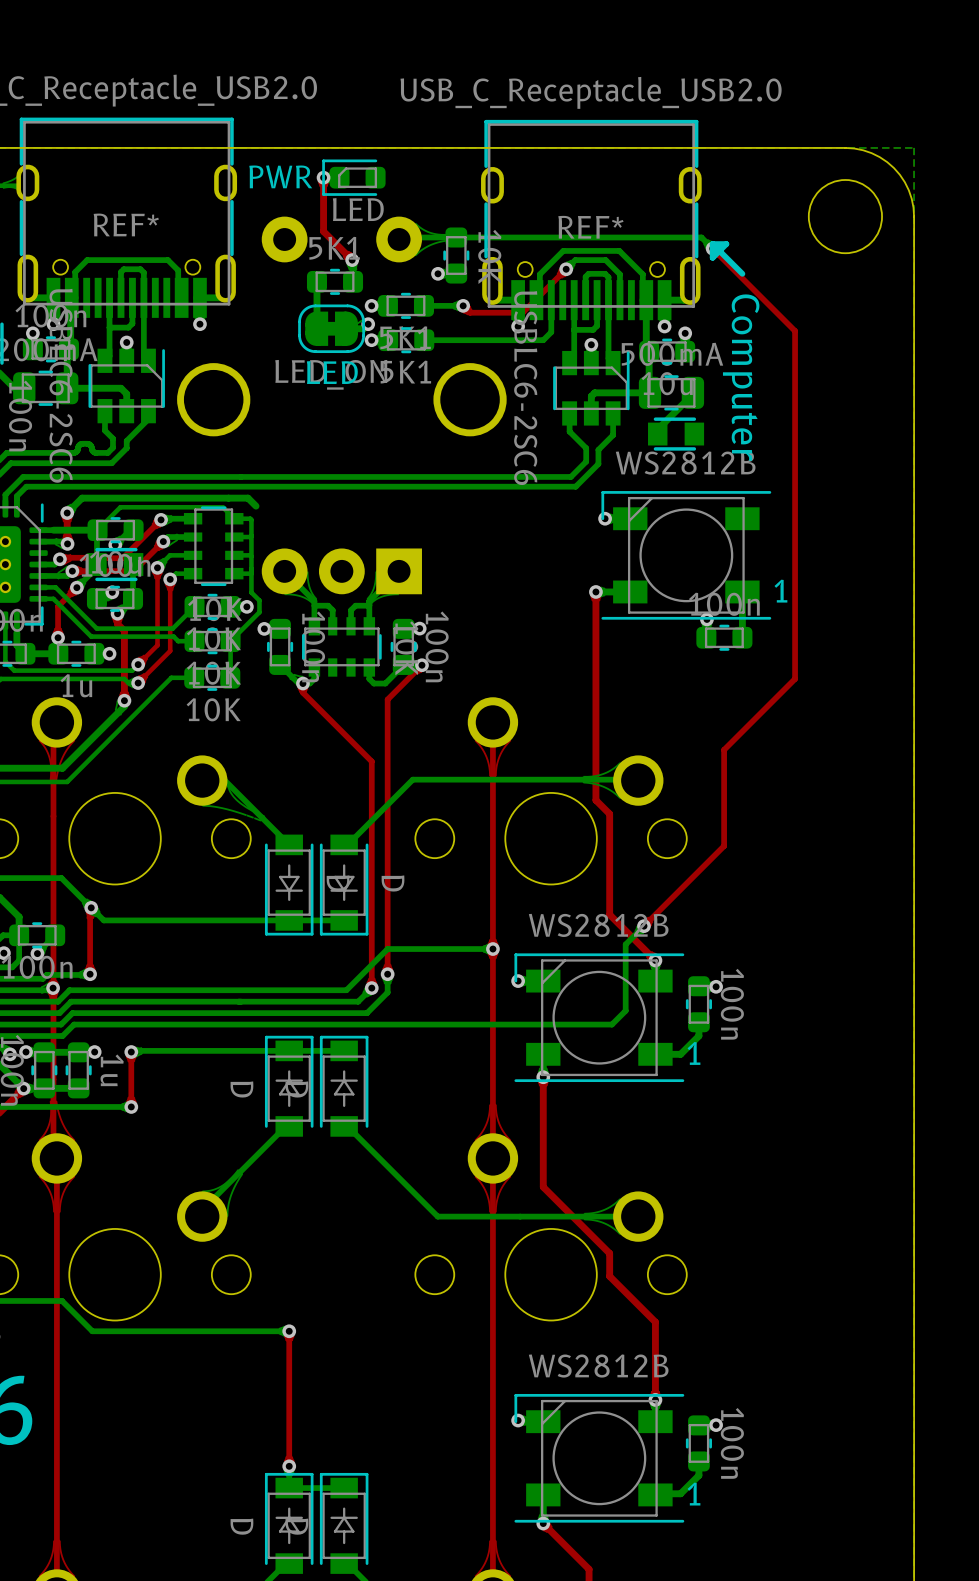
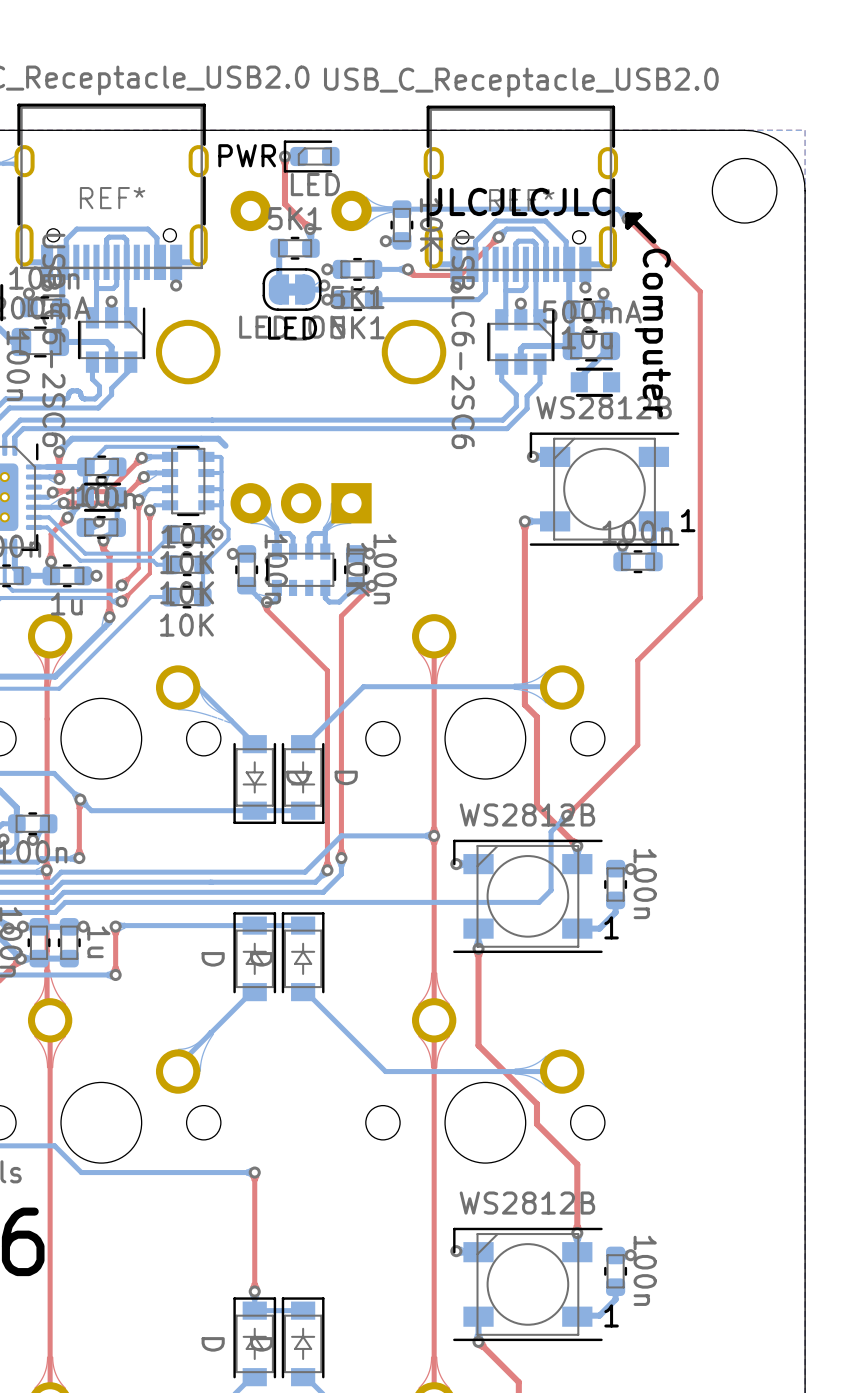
text: none -> JLCJLCJLC (520, 201)

